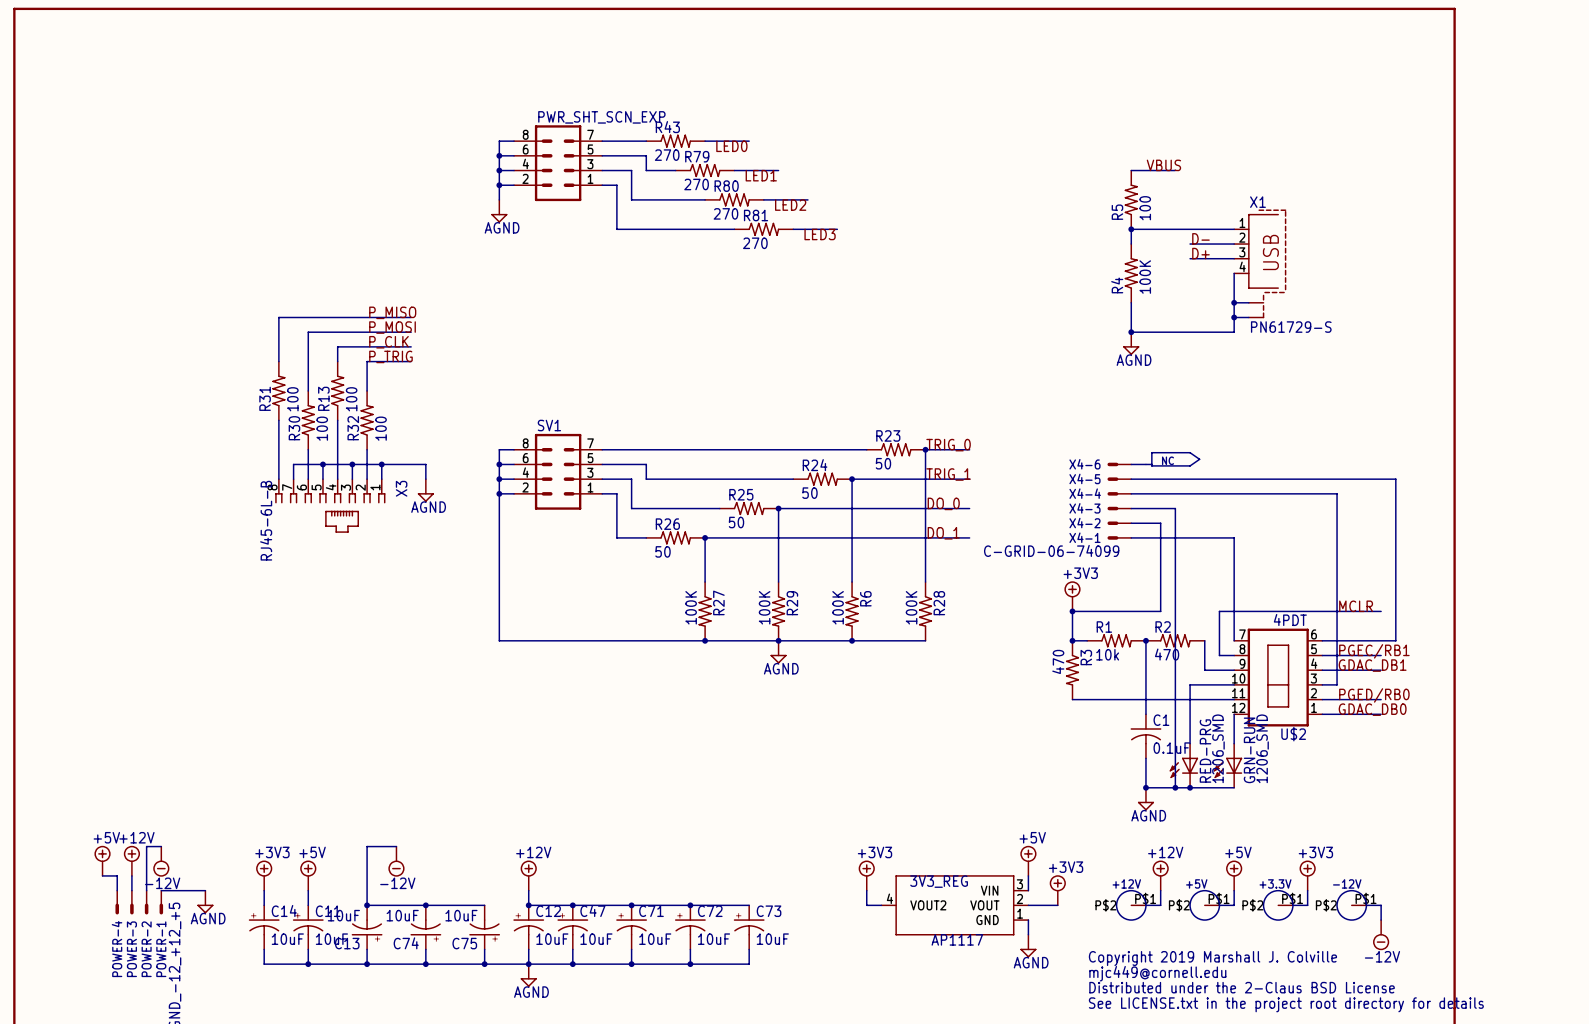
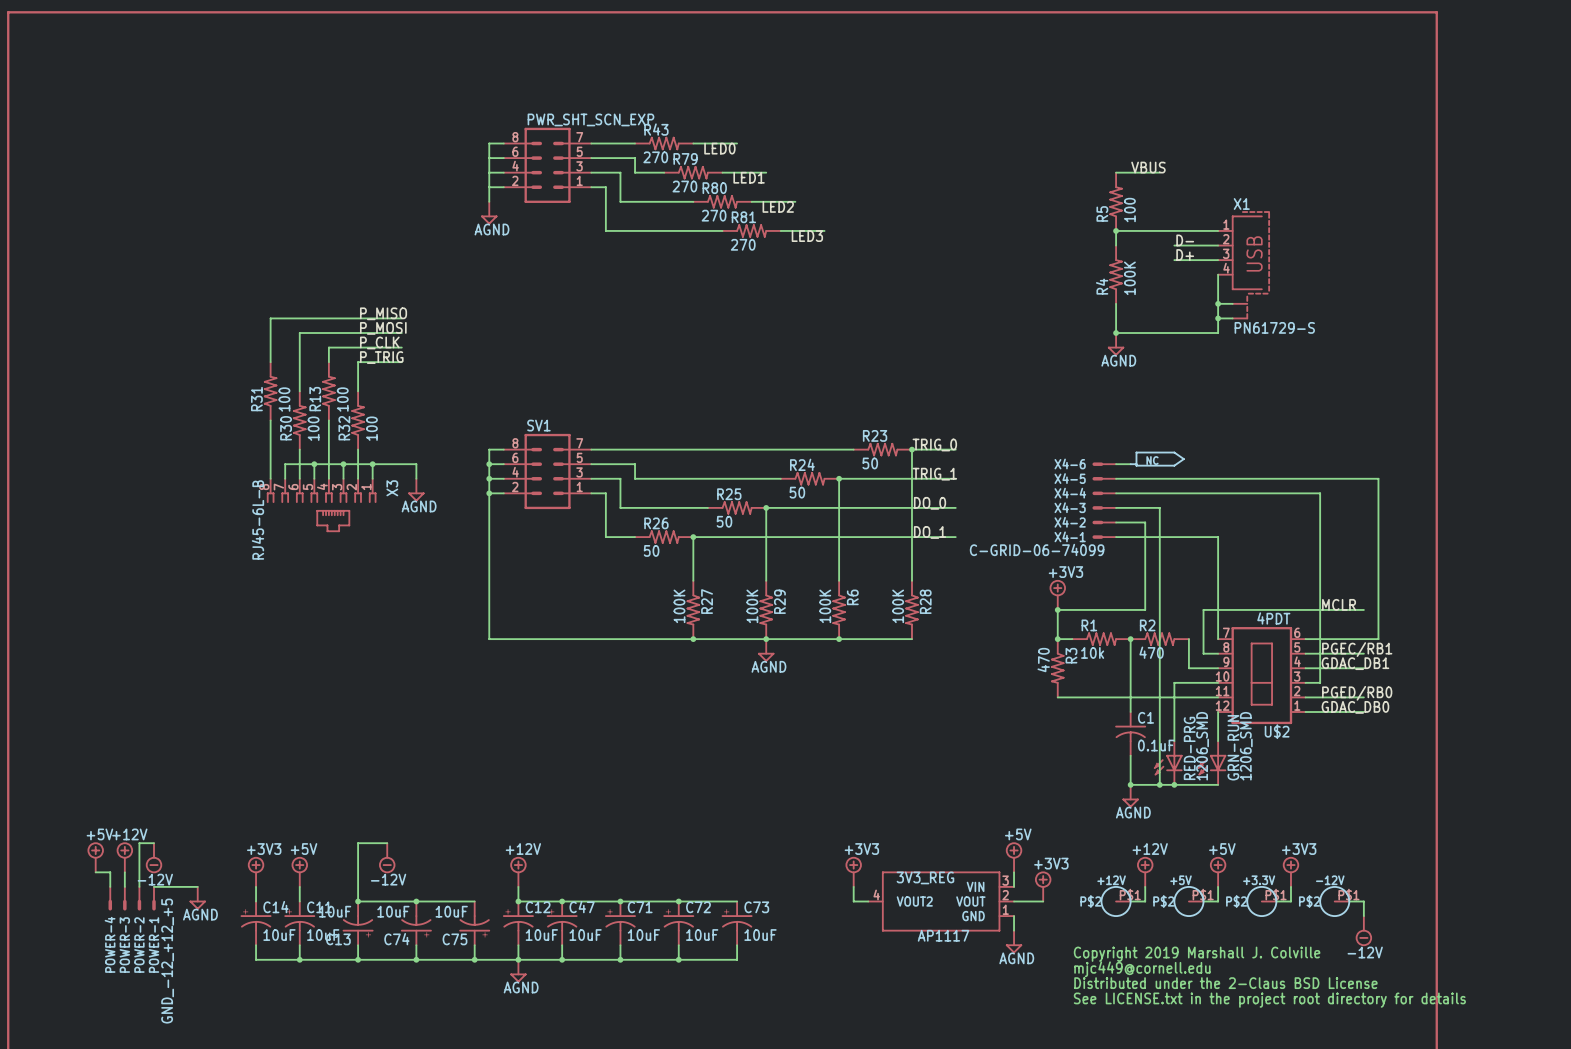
junction: (499, 155) -> none
junction: (499, 170) -> none
junction: (499, 185) -> none

